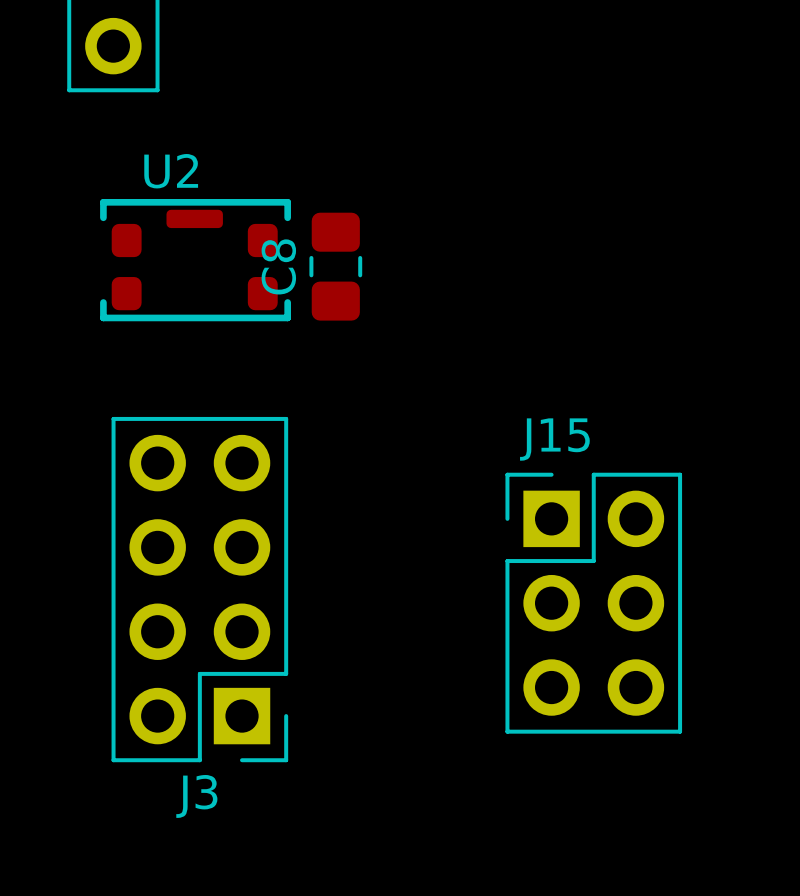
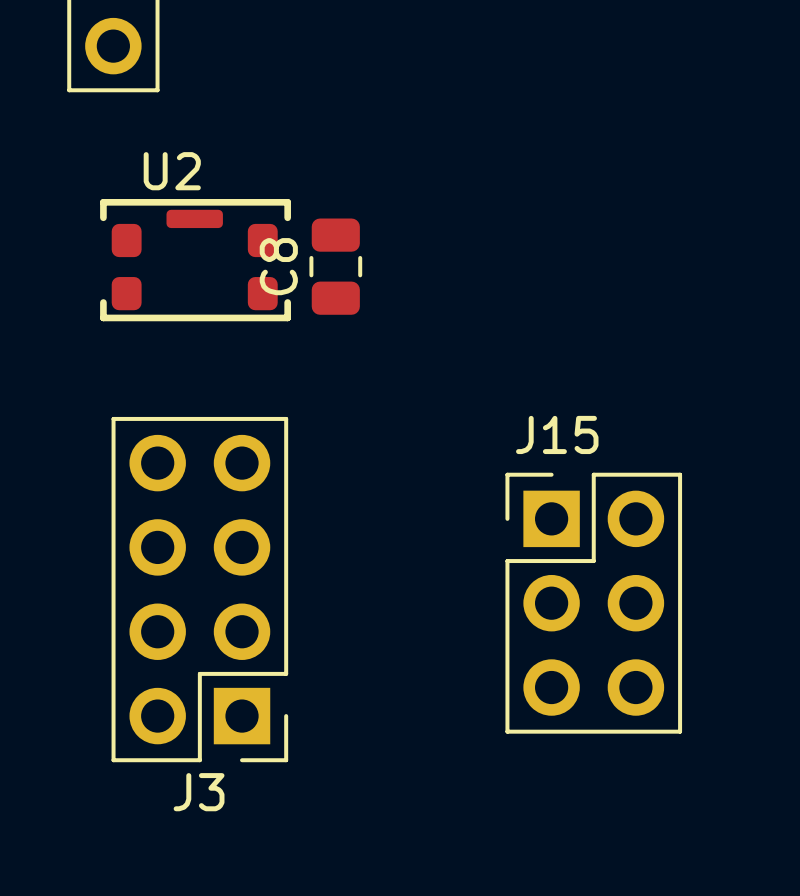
C8 footprint: [309, 212, 363, 321] -> [309, 218, 363, 315]

